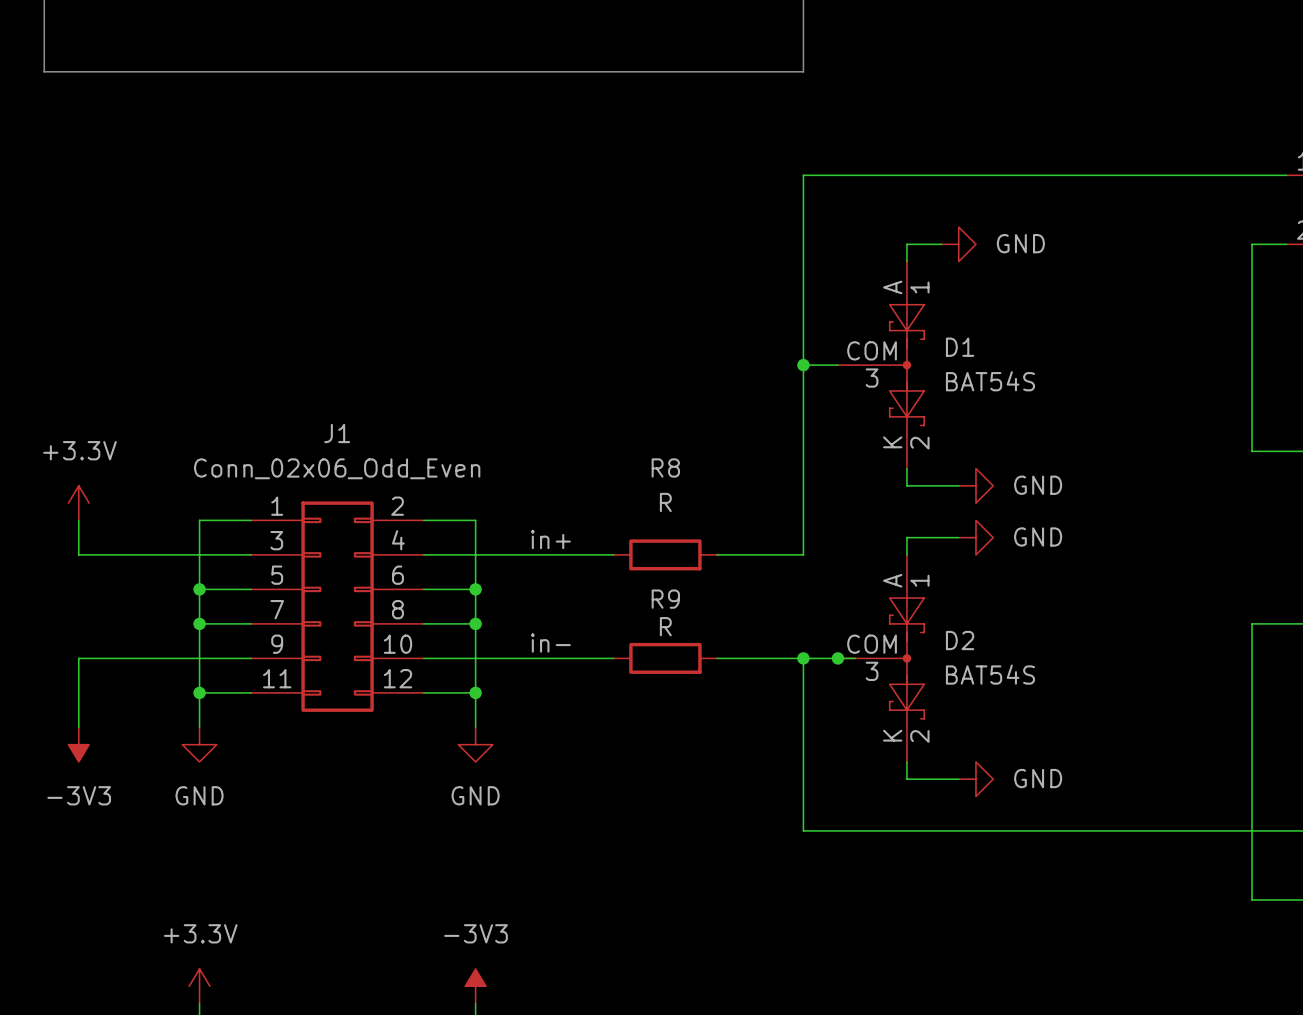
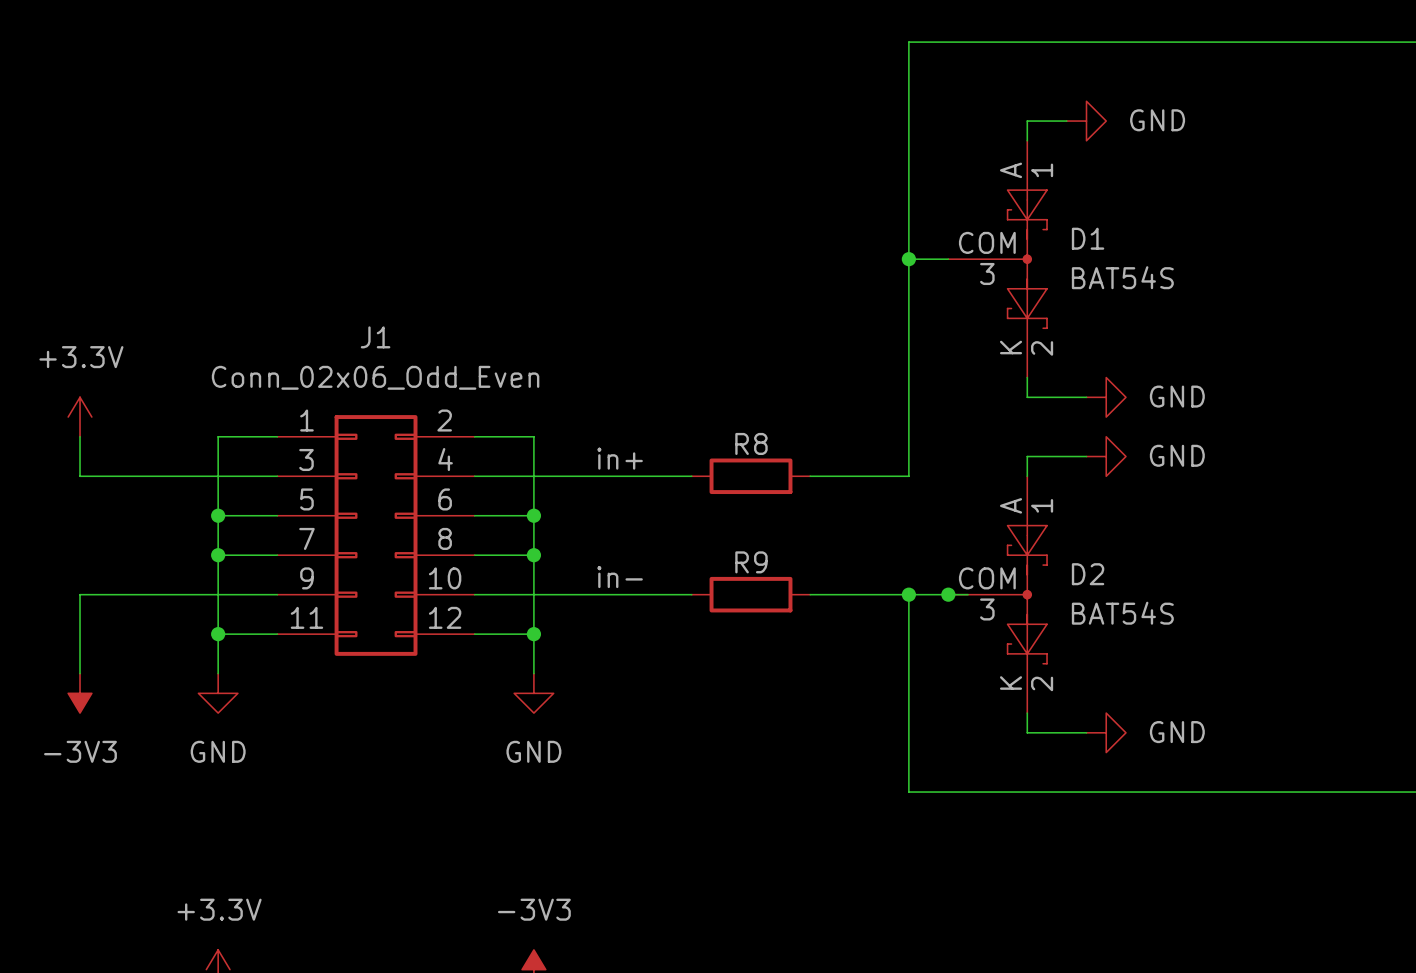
R8 name position: R8 (665, 467) -> R8 (751, 443)
R8 value: R (665, 502) -> none
R9 name position: R9 (665, 599) -> R9 (751, 562)
R9 value: R (665, 626) -> none

